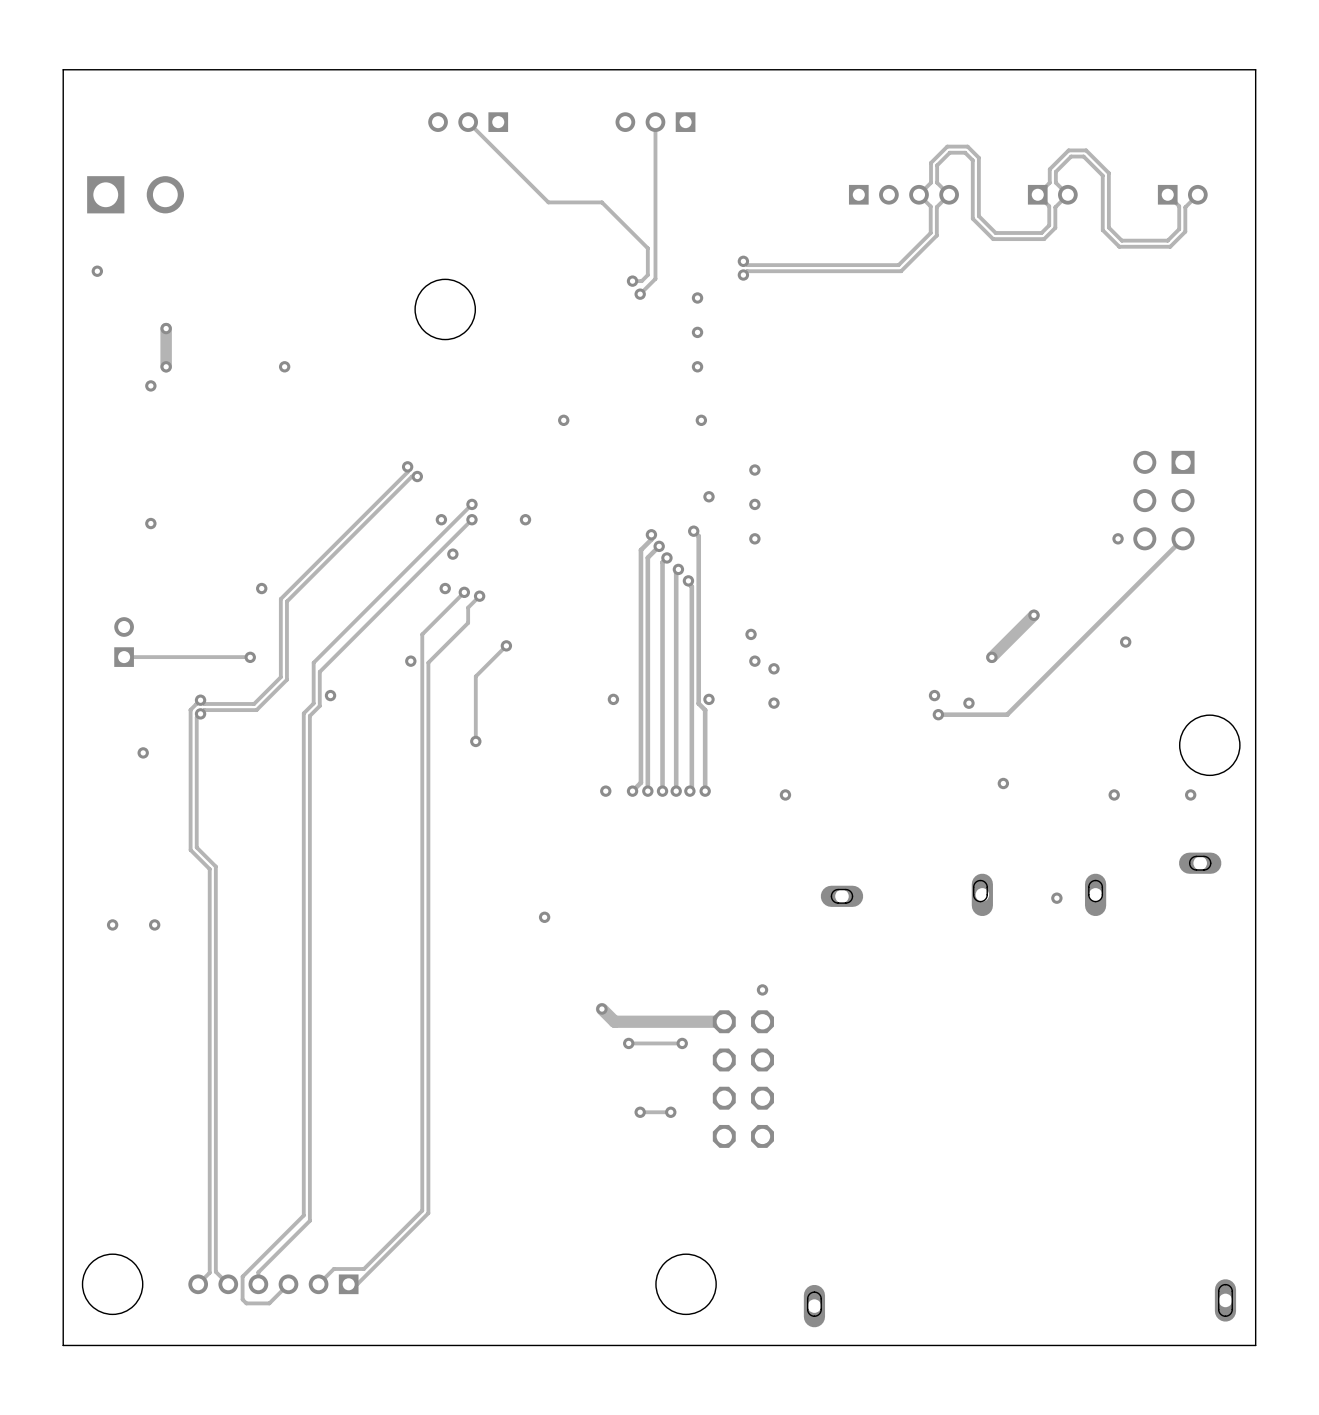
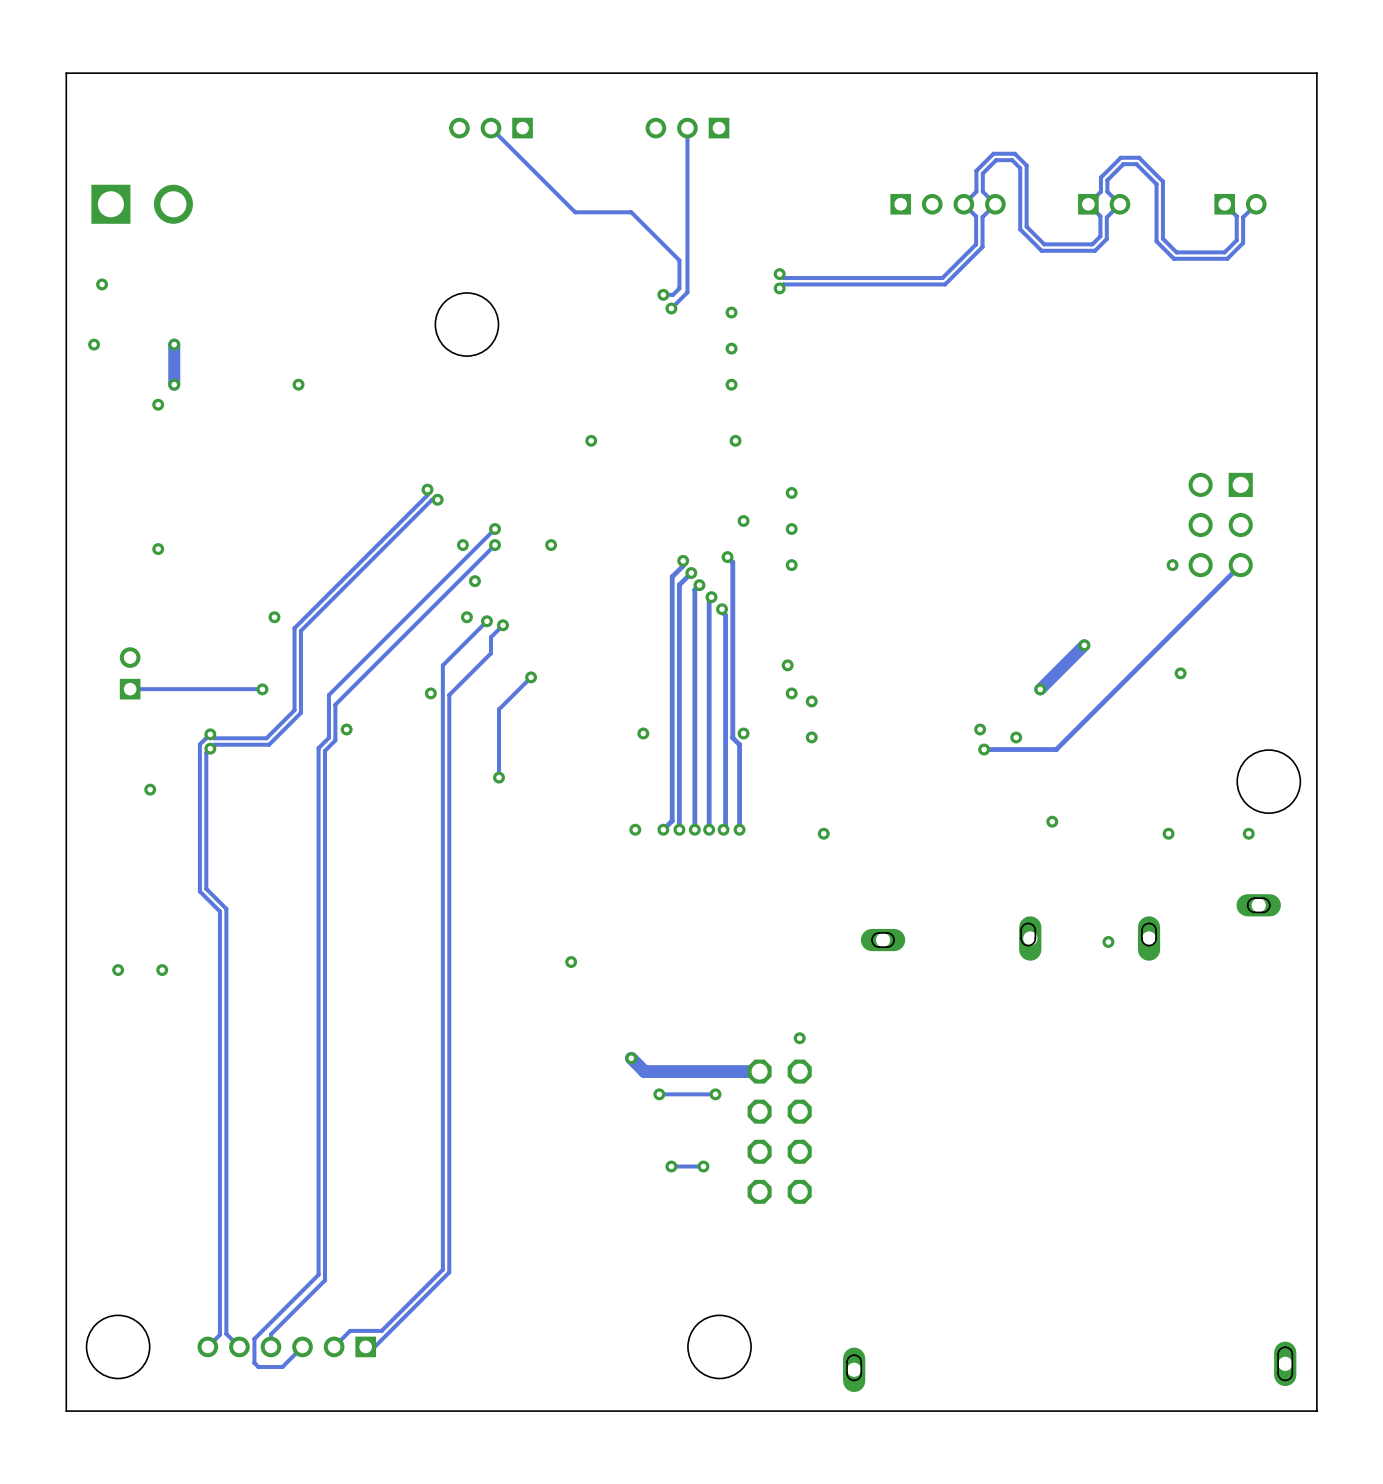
via: none -> (94, 344)

